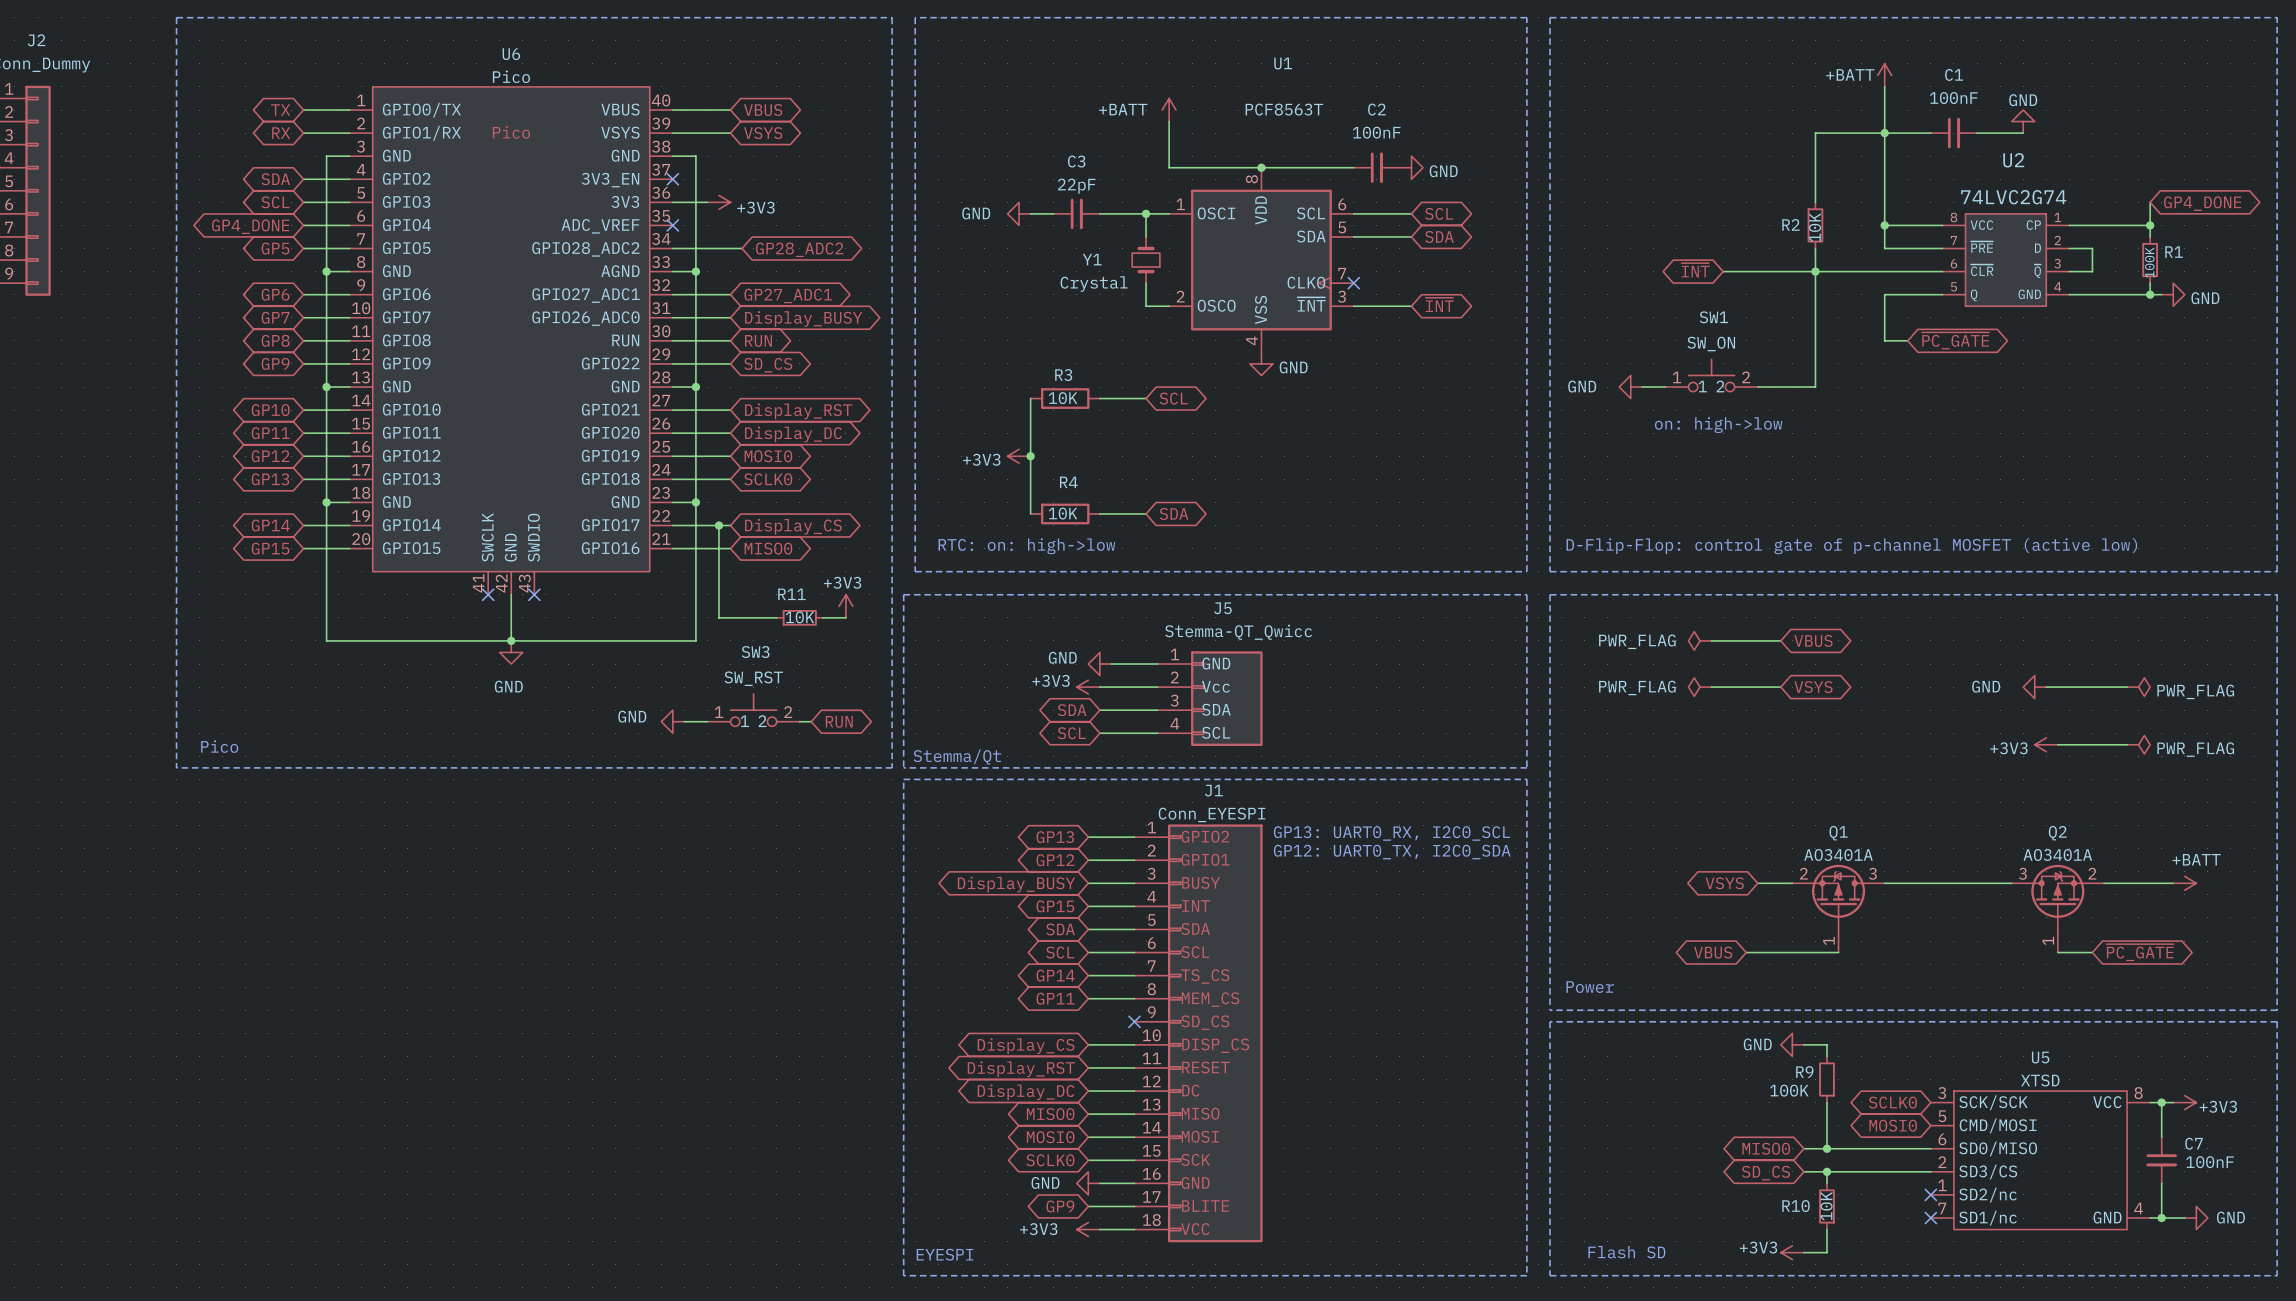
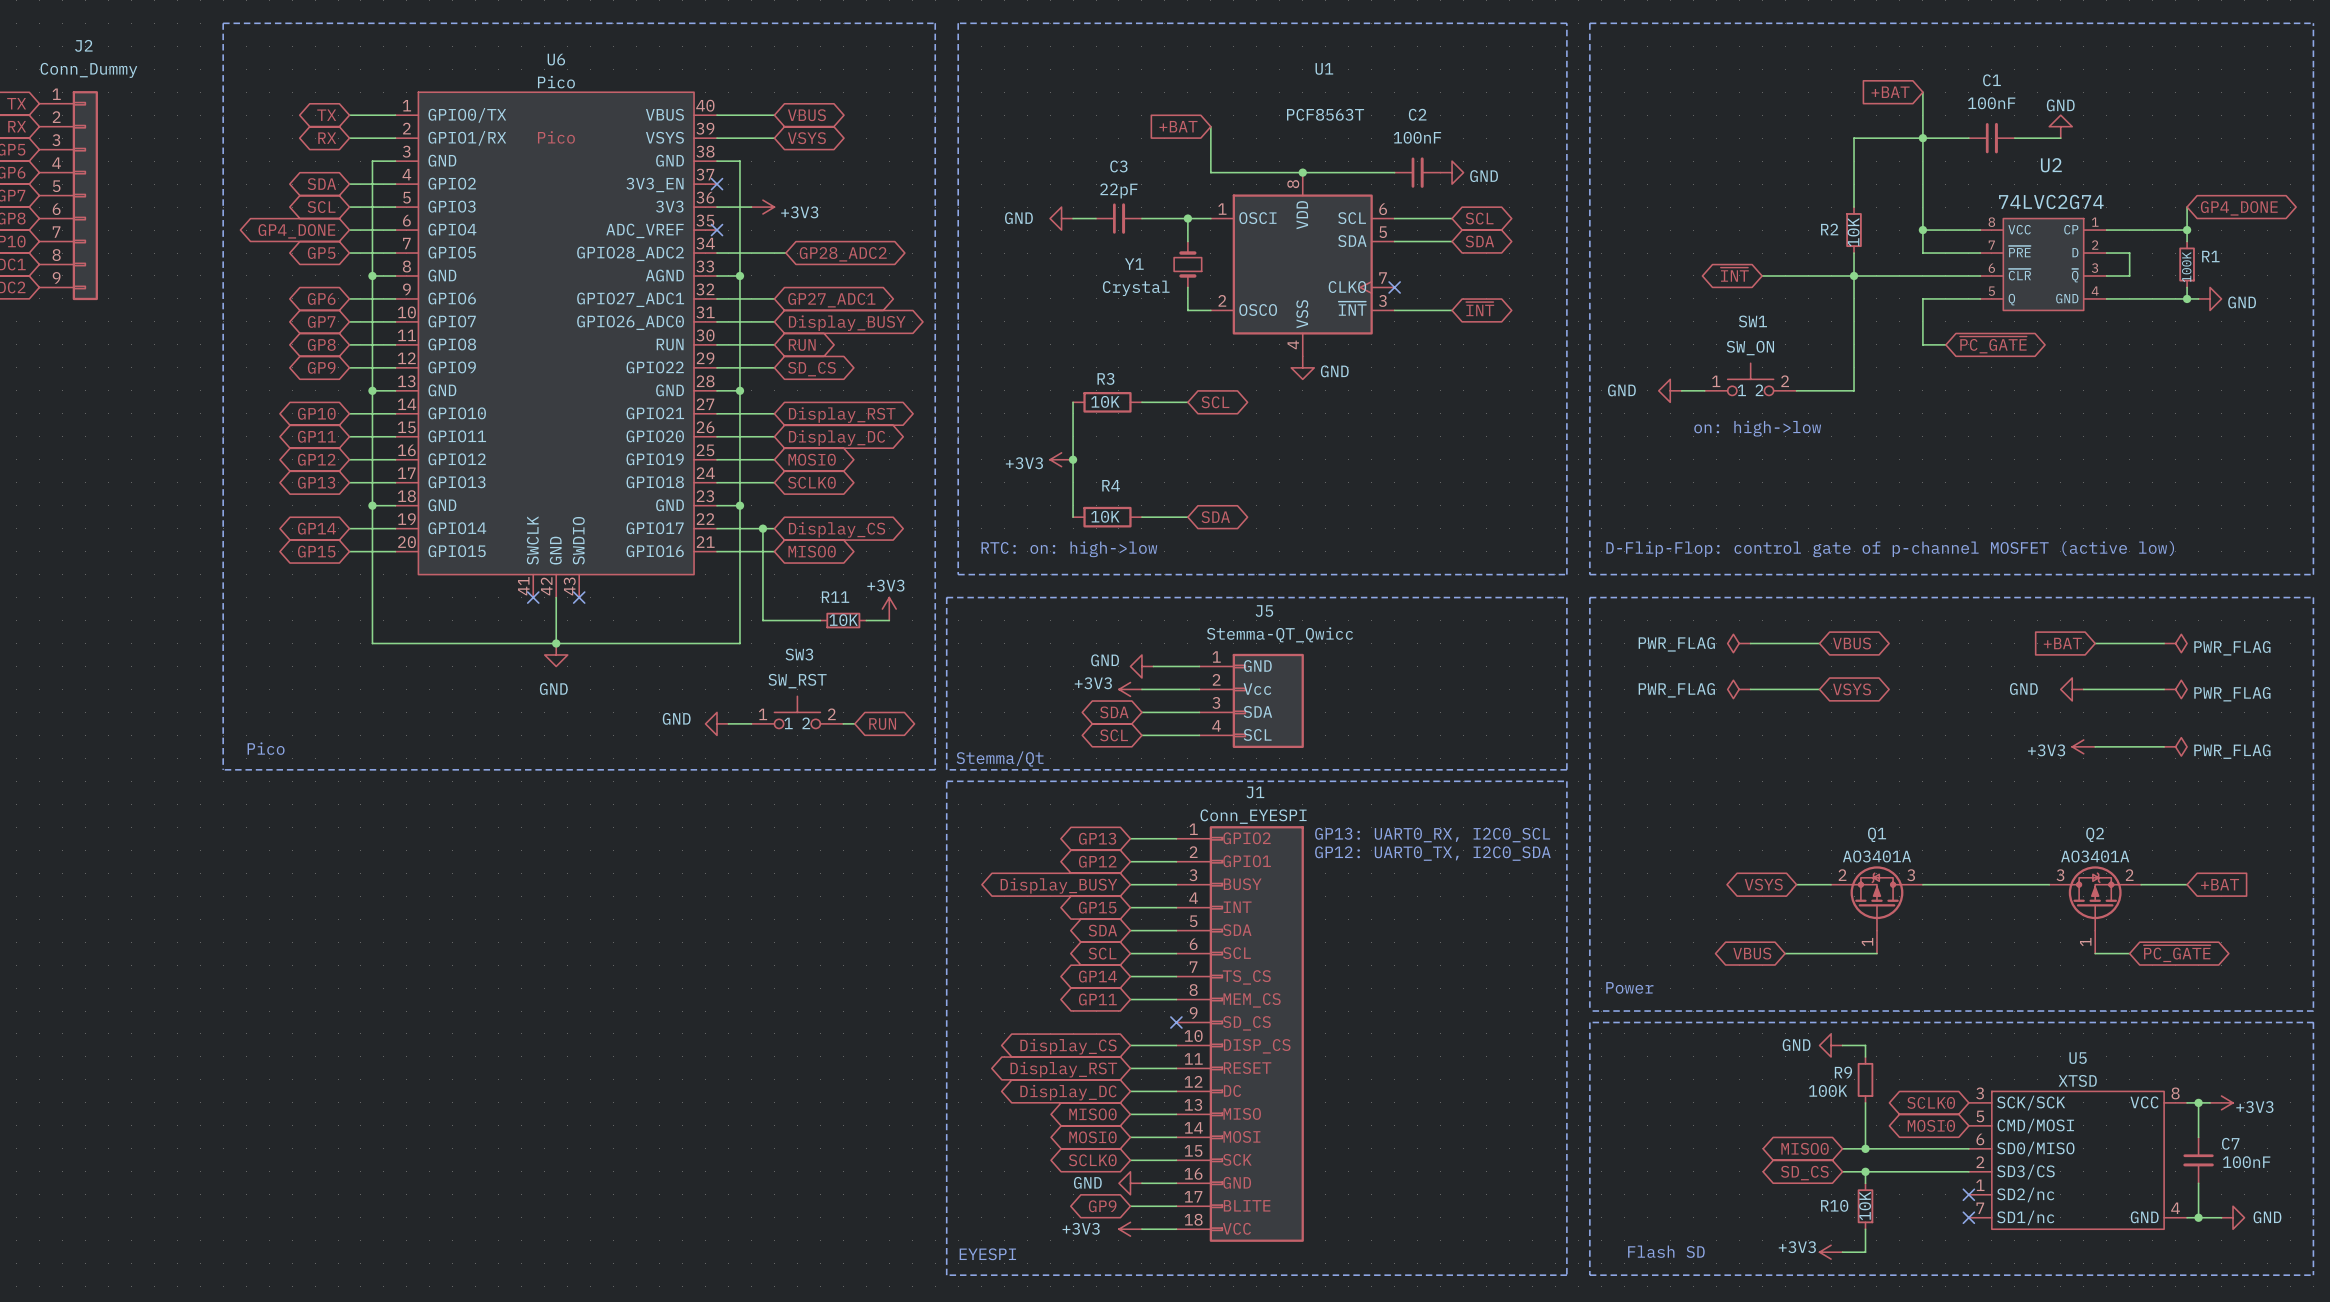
power symbol: +BATT (1884, 75) -> none
global label: none -> +BAT (1890, 92)
power symbol: +BATT (1169, 110) -> none
global label: none -> +BAT (1178, 126)
global label: none -> +BAT (2062, 643)
wire: none -> (2095, 643) (2164, 643)
power symbol: none -> PWR_FLAG (2175, 643)
wire: (2150, 883) (2173, 883) -> none
global label: none -> +BAT (2220, 884)
power symbol: +BATT (2184, 883) -> none

